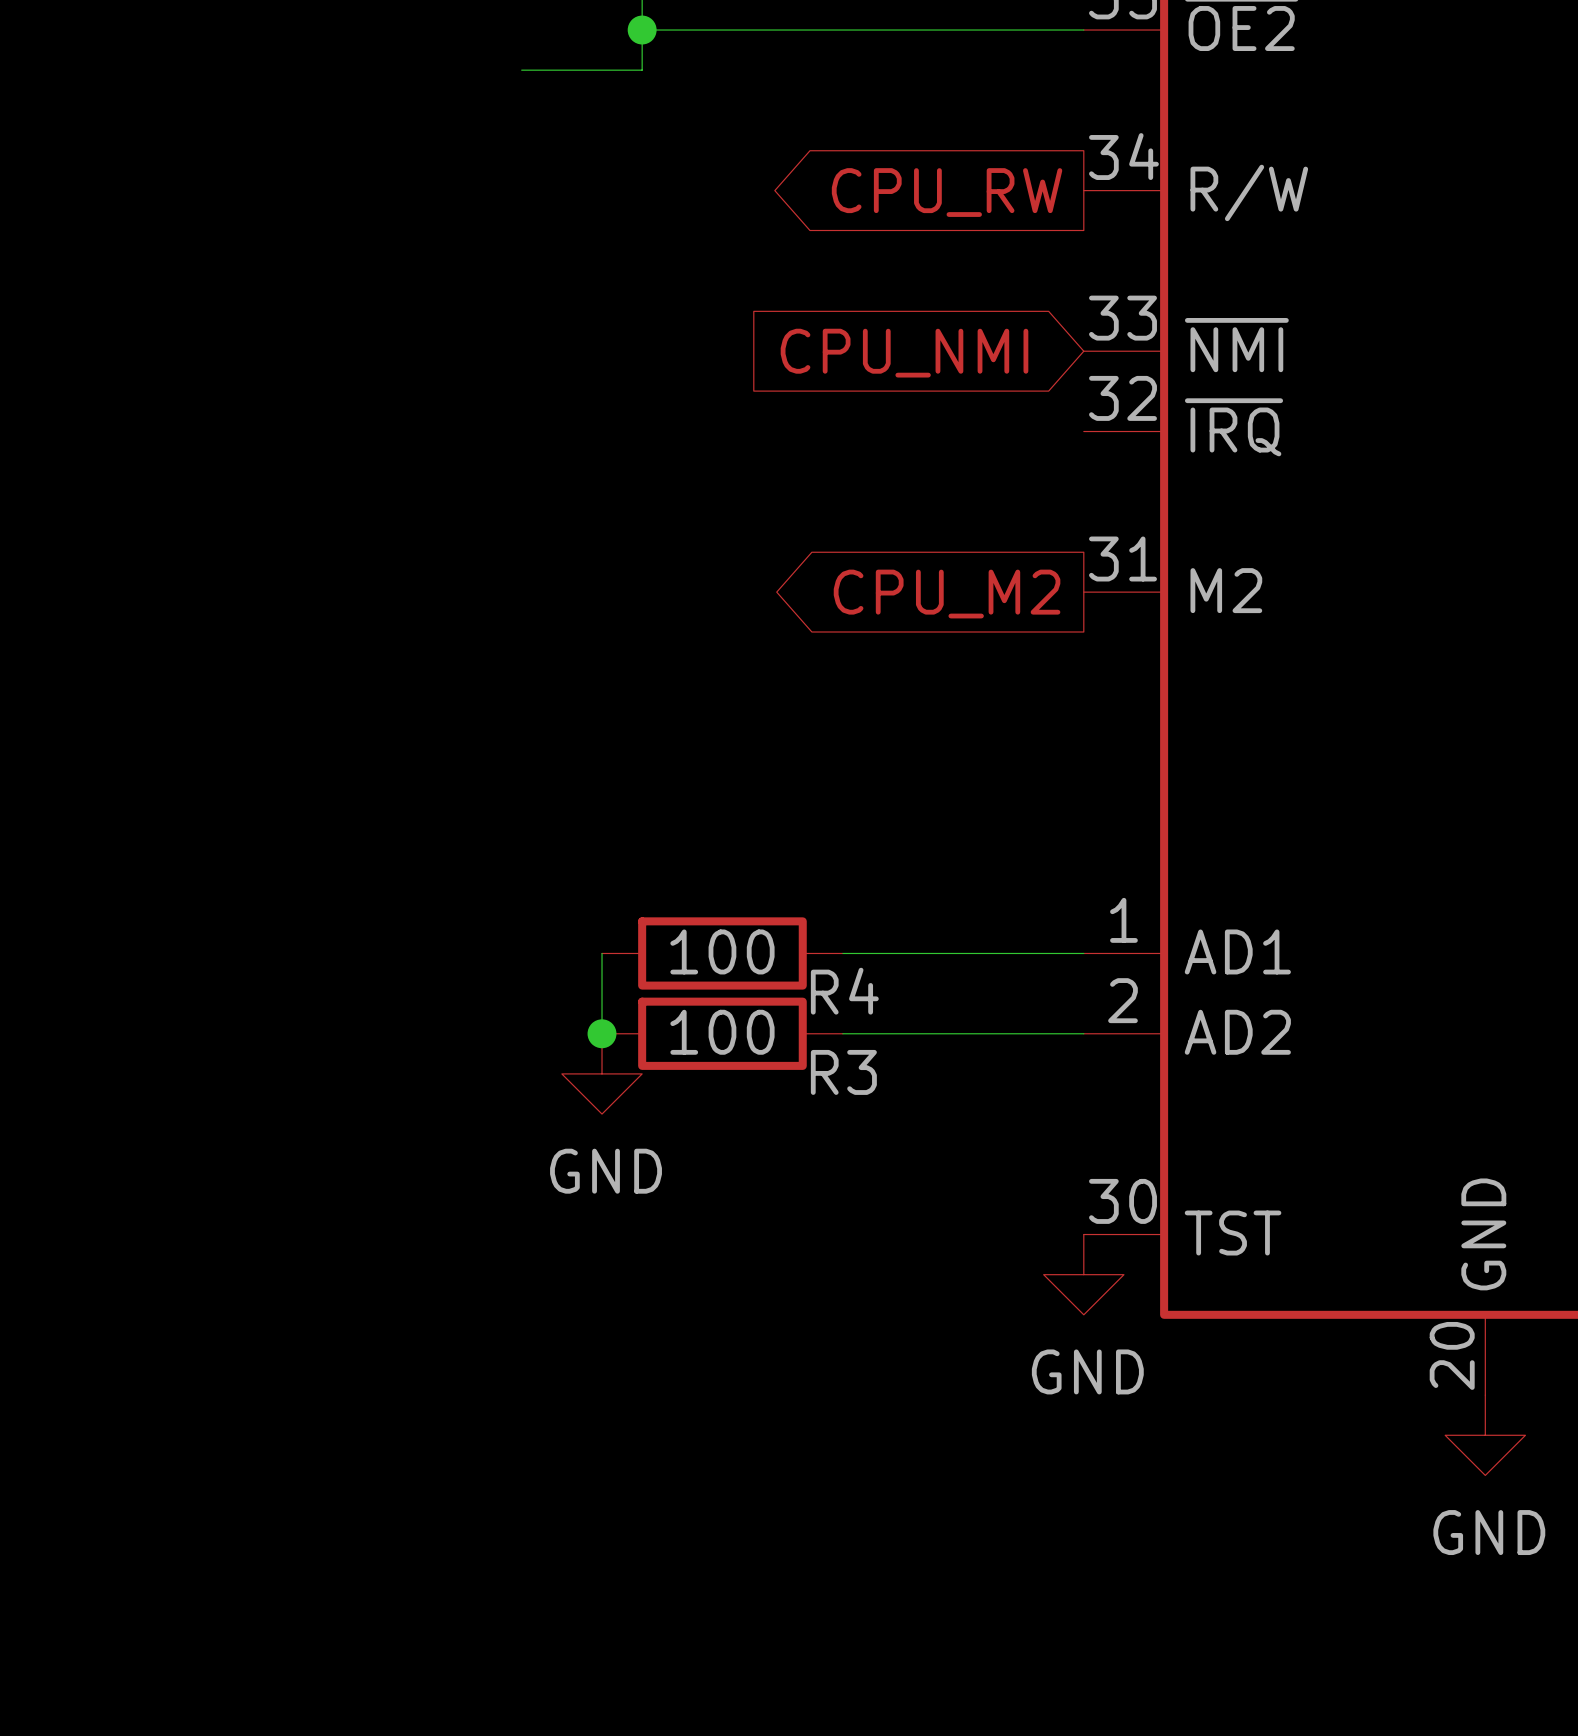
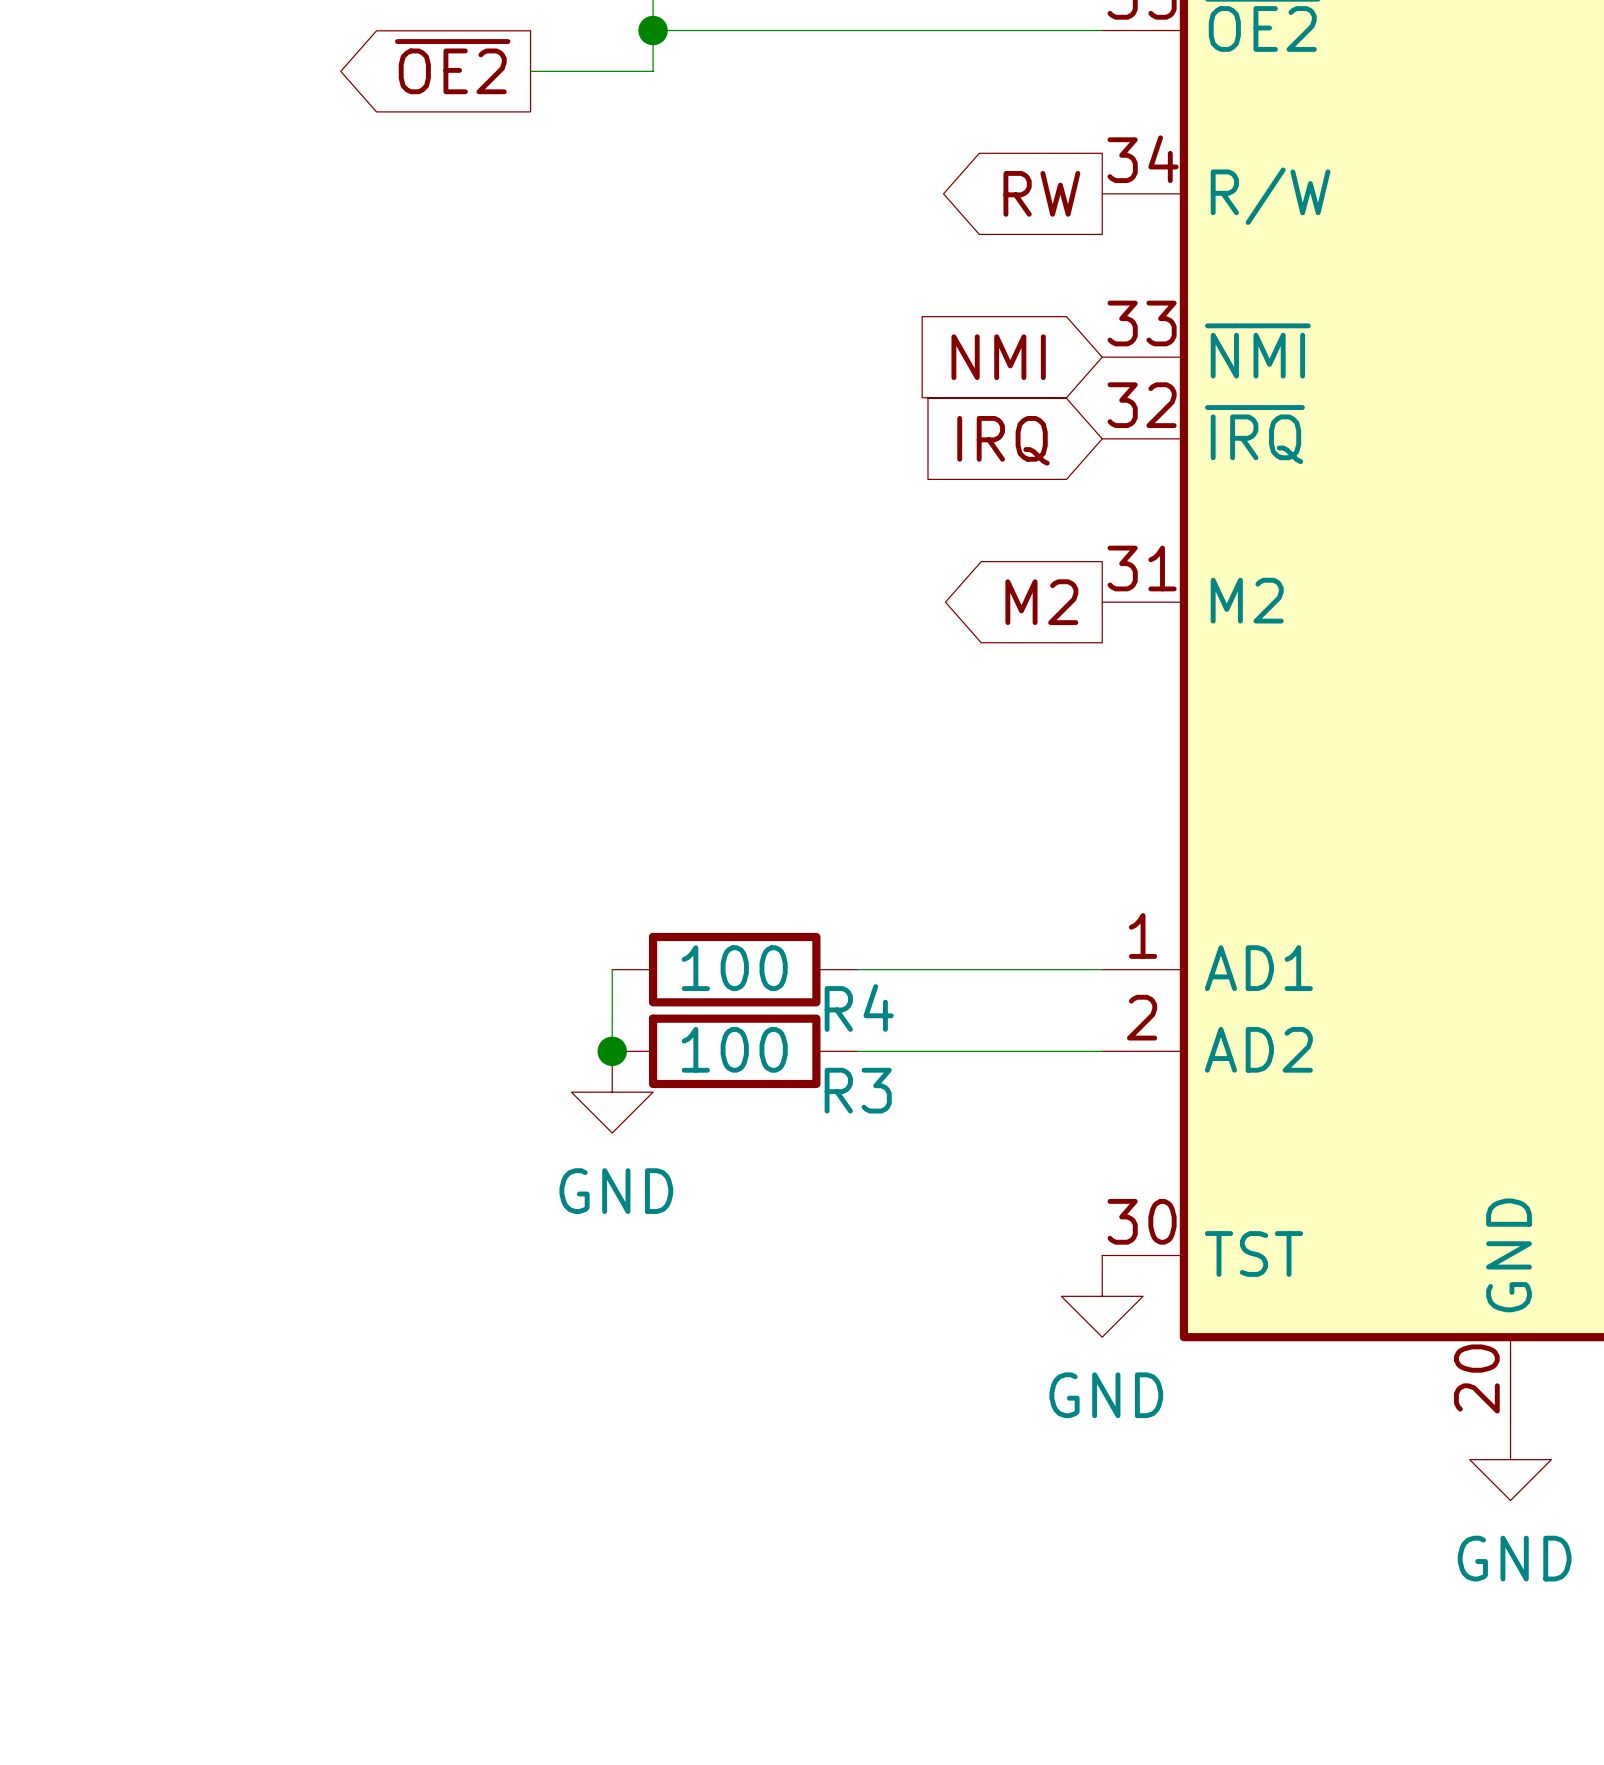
global label: none -> ~{OE2} (452, 66)
global label: CPU_RW (947, 192) -> RW (1041, 193)
global label: CPU_NMI (904, 353) -> NMI (998, 357)
global label: none -> IRQ (1003, 440)
global label: CPU_M2 (947, 594) -> M2 (1041, 602)

